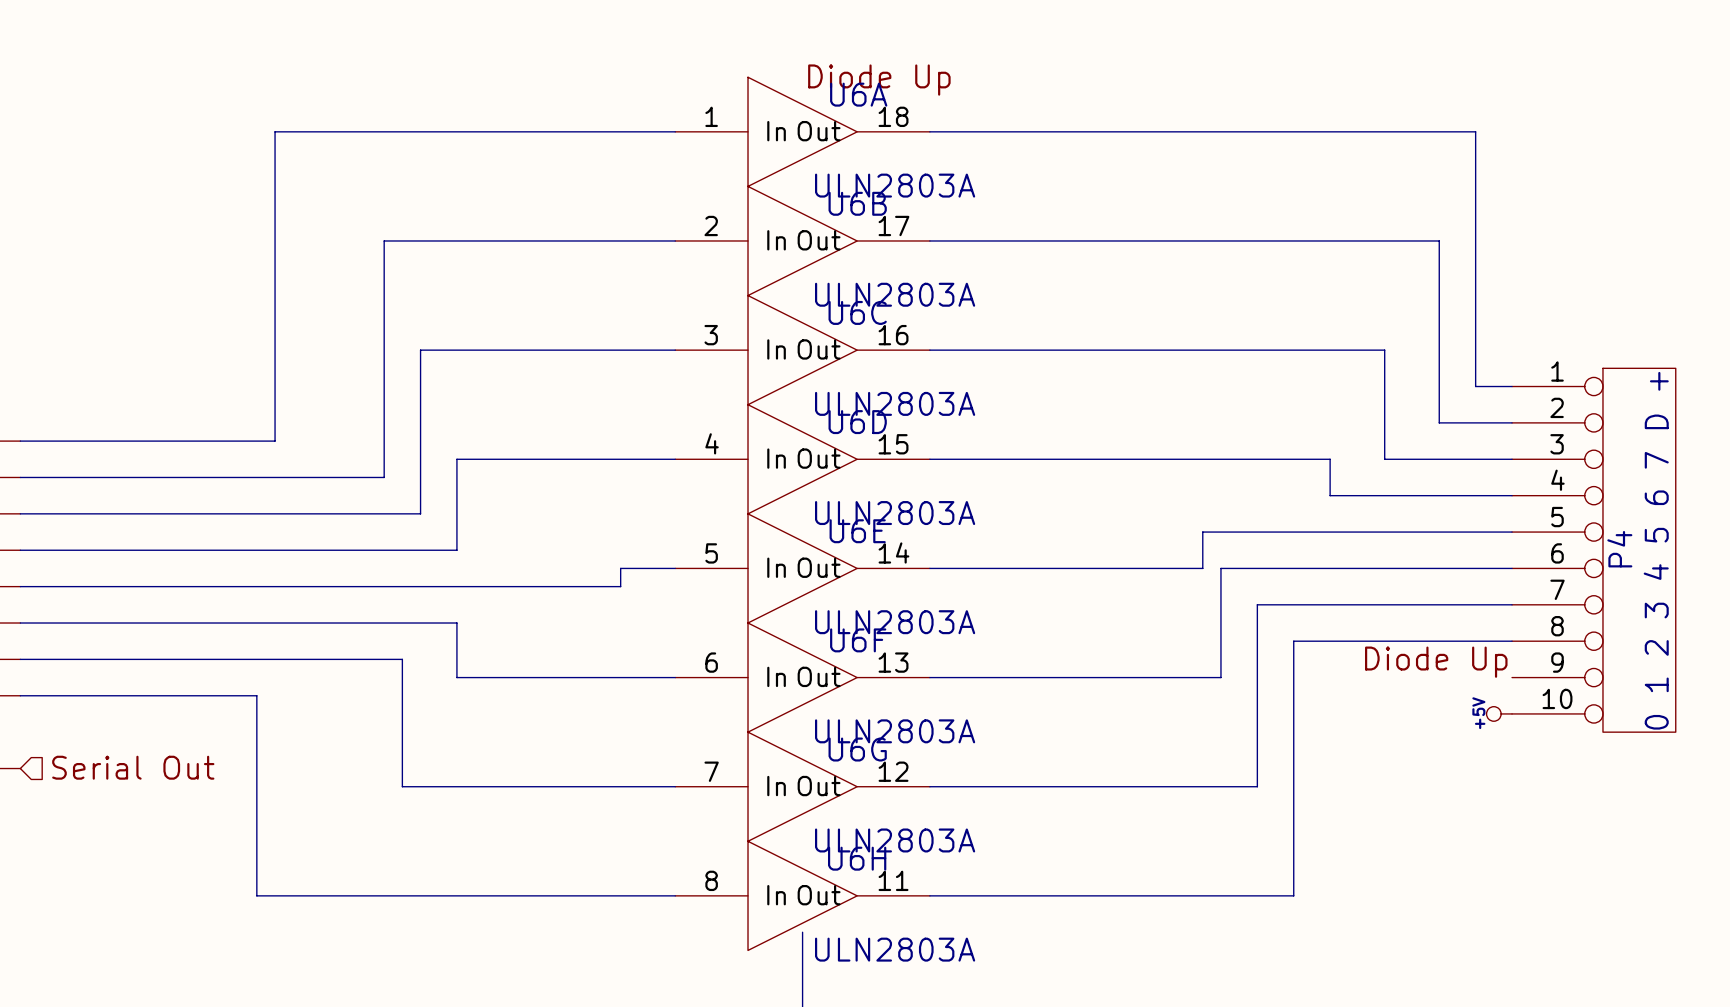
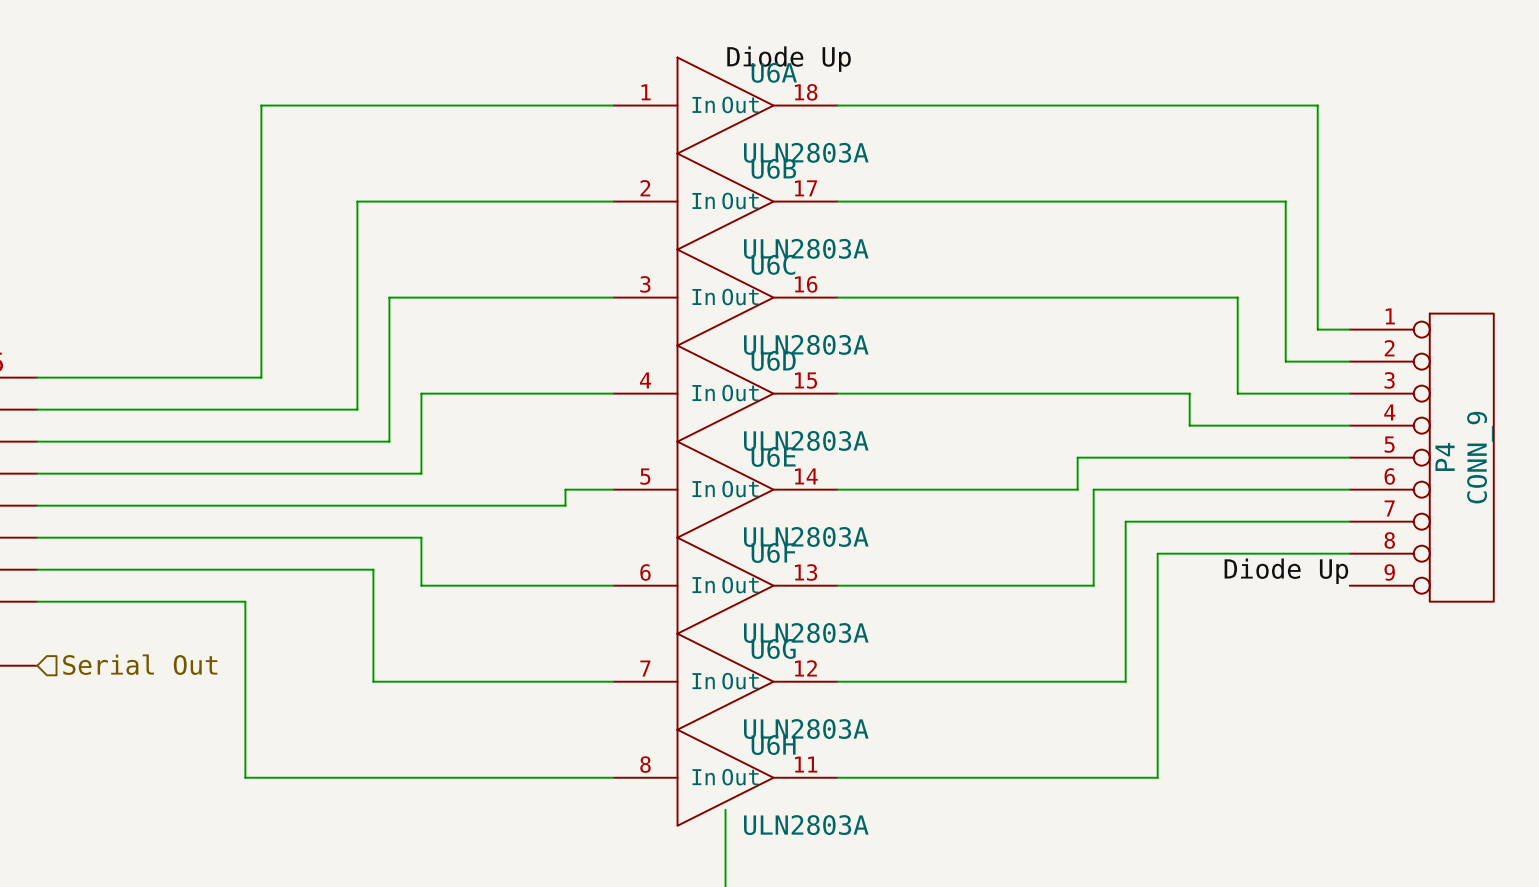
P4 symbol: [1512, 368, 1676, 733] -> [1349, 313, 1494, 602]
P4 value: 0 1 2 3 4 5 6 7 D + (1656, 550) -> CONN_9 (1479, 457)
power symbol: +5V (1499, 713) -> none

